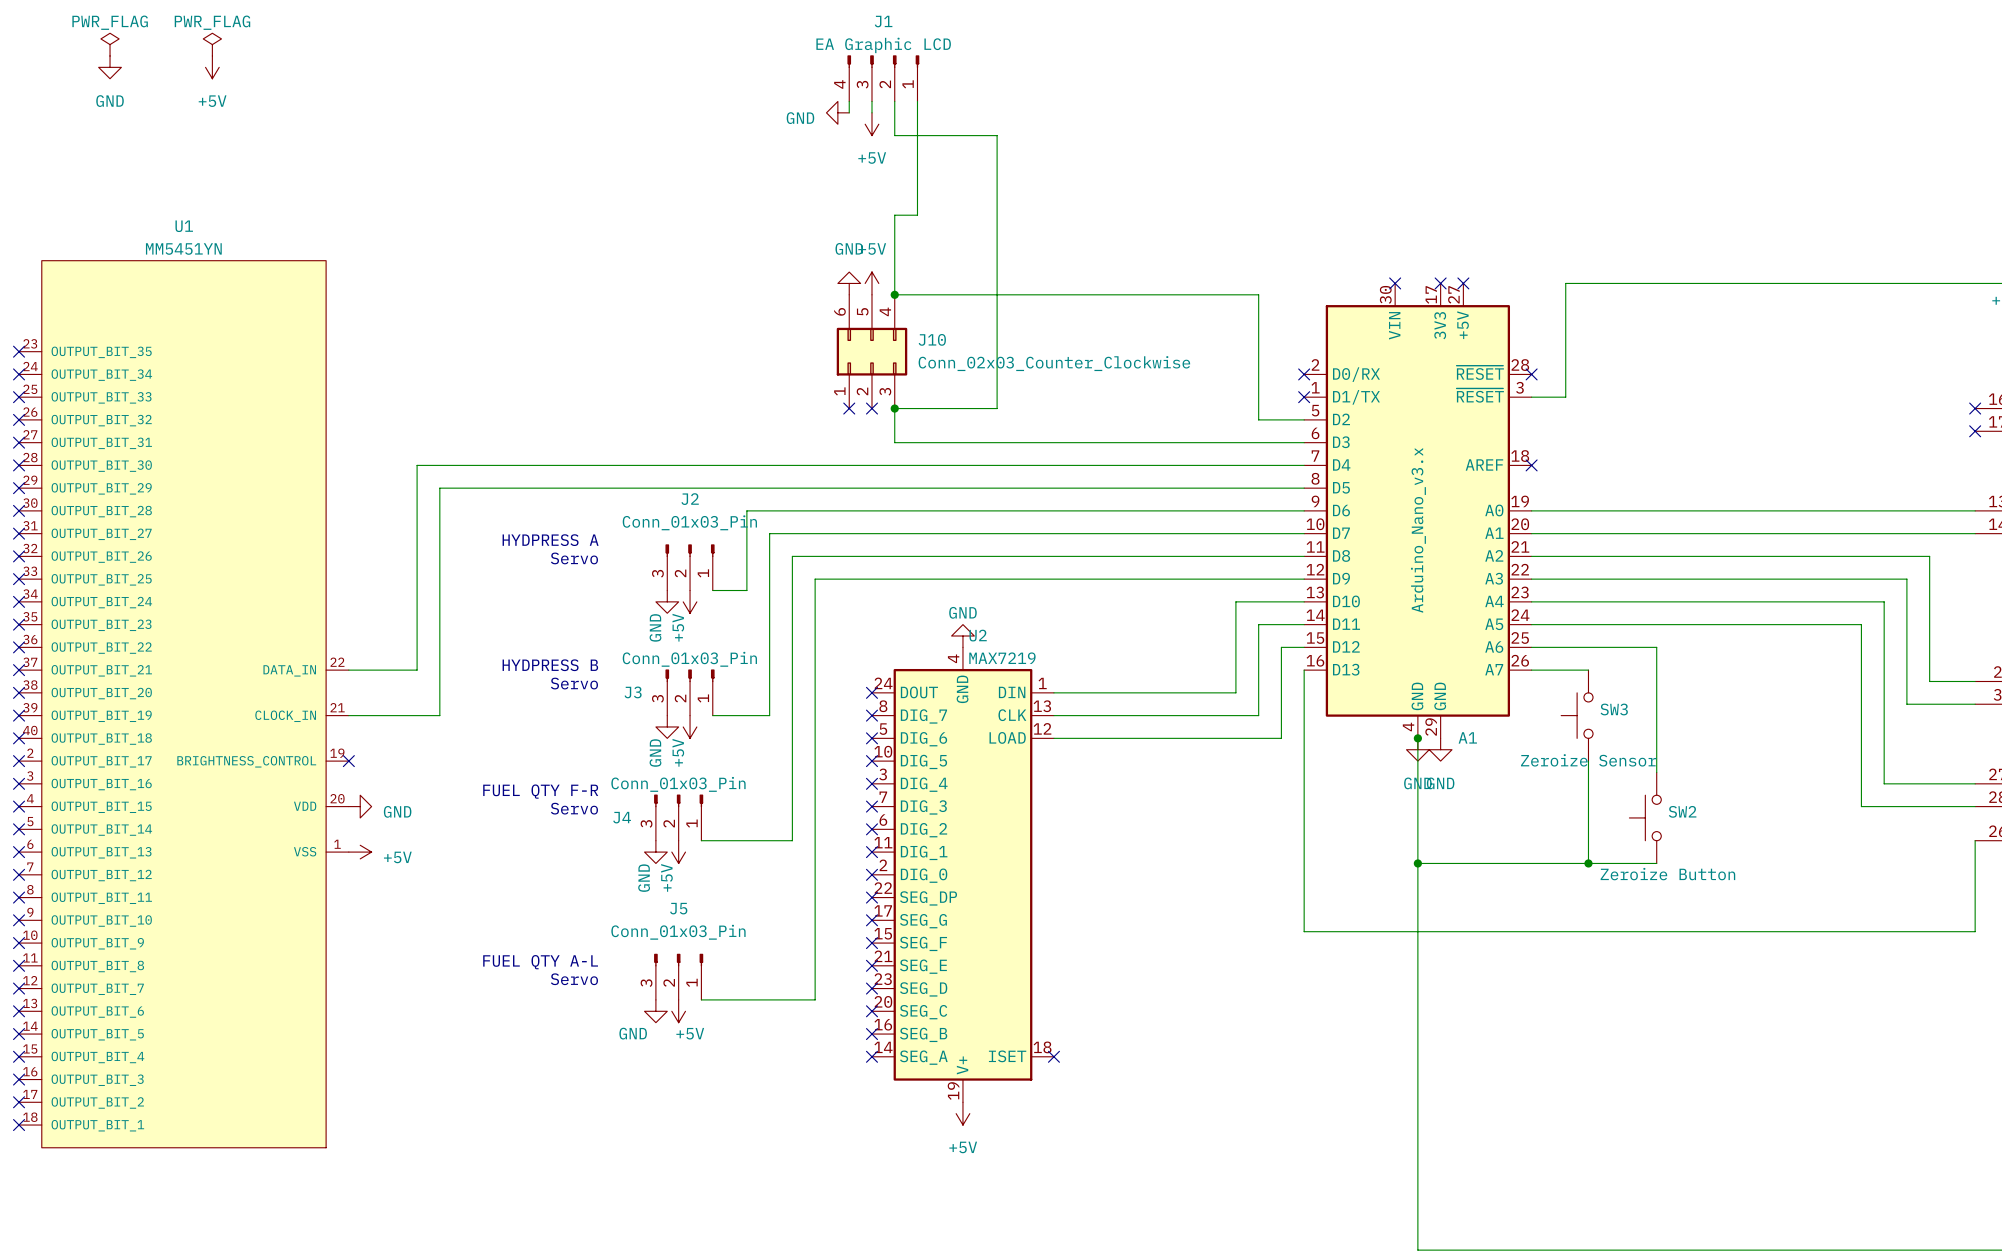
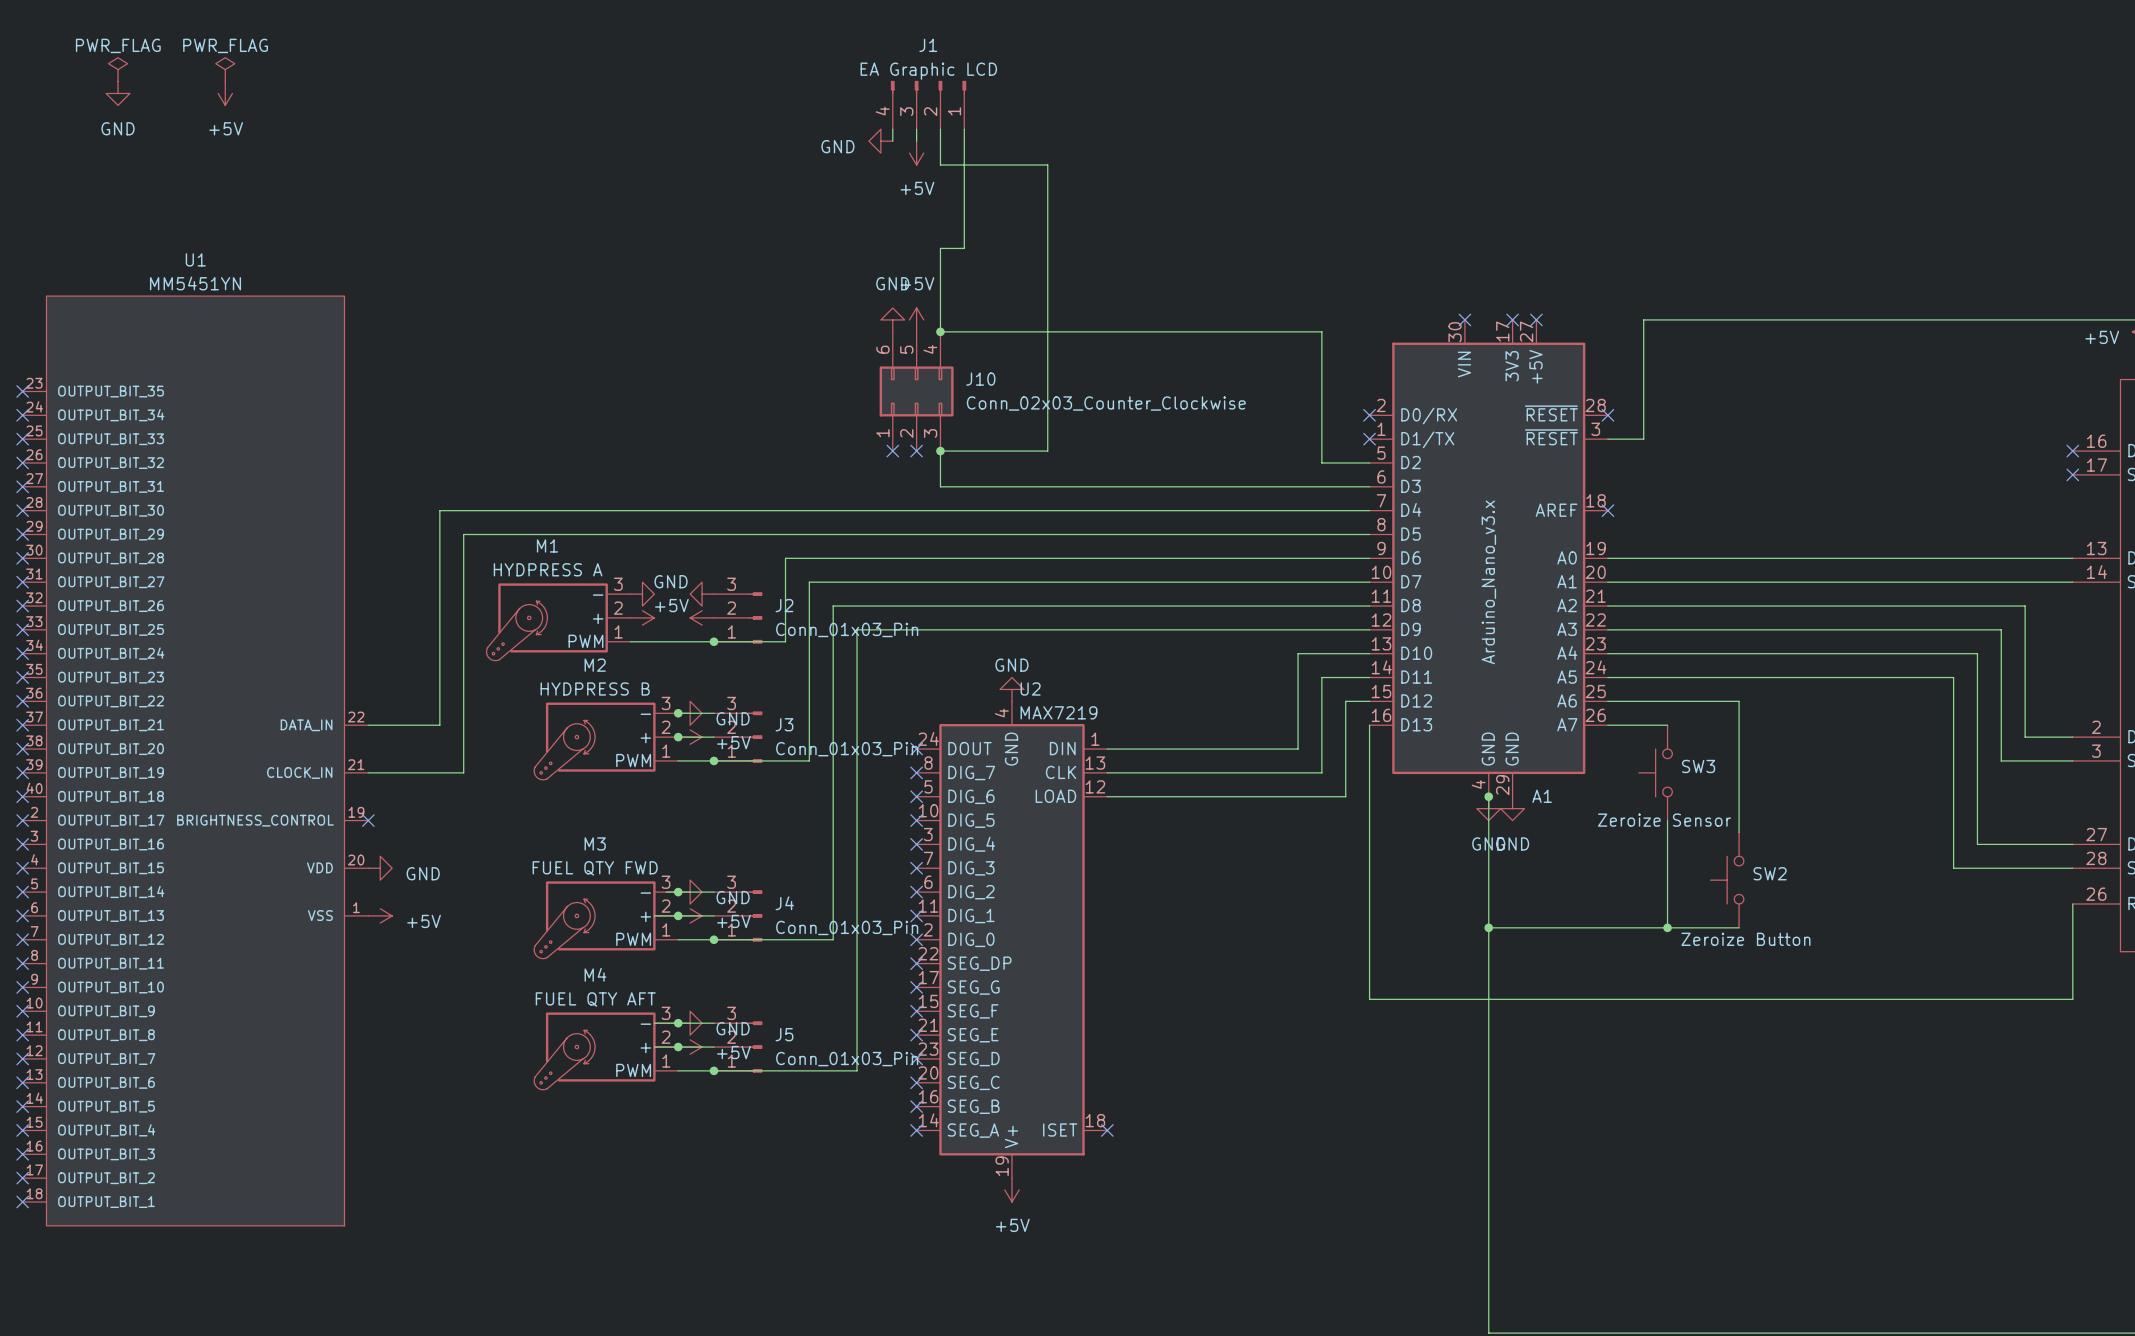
J2 name position: J2 (690, 499) -> J2 (784, 605)
J2 value position: Conn_01x03_Pin (689, 522) -> Conn_01x03_Pin (847, 629)
text: HYDPRESS A (550, 540) -> none
power symbol: none -> (642, 594)
power symbol: none -> GND (702, 594)
J2 rotation: 0° (690, 550) -> 90° clockwise (755, 617)
text: Servo (574, 558) -> none
power symbol: none -> (642, 617)
M1: none -> HYDPRESS A (558, 622)
wire: none -> (630, 641) (749, 641)
junction: none -> (713, 641)
power symbol: GND (667, 601) -> none
power symbol rotation: 0° (690, 601) -> 90° clockwise (702, 617)
power symbol position: +5V (690, 601) -> +5V (702, 617)
wire: none -> (678, 713) (713, 713)
junction: none -> (678, 713)
power symbol: none -> GND (690, 713)
J3 value position: Conn_01x03_Pin (689, 659) -> Conn_01x03_Pin (847, 749)
text: HYDPRESS B (550, 665) -> none
J3 rotation: 0° (690, 675) -> 90° clockwise (755, 737)
wire: none -> (678, 737) (713, 737)
junction: none -> (678, 737)
power symbol: none -> +5V (690, 737)
text: Servo (574, 683) -> none
M2: none -> HYDPRESS B (606, 741)
J3 name position: J3 (633, 692) -> J3 (784, 724)
junction: none -> (713, 760)
wire: (769, 704) (769, 715) (712, 715) -> (809, 760) (678, 760)
power symbol: GND (667, 726) -> none
power symbol: +5V (690, 726) -> none
J4 value position: Conn_01x03_Pin (678, 784) -> Conn_01x03_Pin (847, 927)
text: FUEL QTY F-R (540, 791) -> none
J4 rotation: 0° (678, 800) -> 90° clockwise (755, 915)
text: Servo (574, 808) -> none
J4 name position: J4 (622, 817) -> J4 (784, 903)
J4 position: (678, 817) -> (738, 915)
wire: none -> (666, 892) (713, 892)
junction: none -> (678, 892)
power symbol: none -> GND (690, 892)
wire: (701, 840) (792, 840) -> (678, 939) (833, 939) (833, 903)
wire: none -> (654, 915) (713, 915)
junction: none -> (678, 915)
power symbol: GND (655, 852) -> +5V (690, 915)
power symbol: +5V (678, 852) -> none
M3: none -> FUEL QTY FWD (606, 919)
junction: none -> (713, 939)
J5 name position: J5 (678, 908) -> J5 (784, 1034)
J5 value position: Conn_01x03_Pin (678, 932) -> Conn_01x03_Pin (847, 1059)
wire: none -> (654, 1023) (713, 1023)
junction: none -> (678, 1023)
J5 rotation: 0° (678, 960) -> 90° clockwise (755, 1047)
text: FUEL QTY A-L (540, 962) -> none
wire: none -> (654, 1047) (713, 1047)
junction: none -> (678, 1047)
text: Servo (574, 979) -> none
M4: none -> FUEL QTY AFT (606, 1051)
wire: none -> (678, 1070) (737, 1070)
junction: none -> (713, 1070)
power symbol rotation: 0° (655, 1011) -> 90° counterclockwise (690, 1023)
power symbol position: GND (655, 1011) -> GND (690, 1023)
power symbol rotation: 0° (678, 1011) -> 90° counterclockwise (690, 1047)
power symbol position: +5V (678, 1011) -> +5V (690, 1047)
power symbol text position: GND (633, 1033) -> GND (733, 1028)
power symbol text position: +5V (690, 1033) -> +5V (733, 1052)

